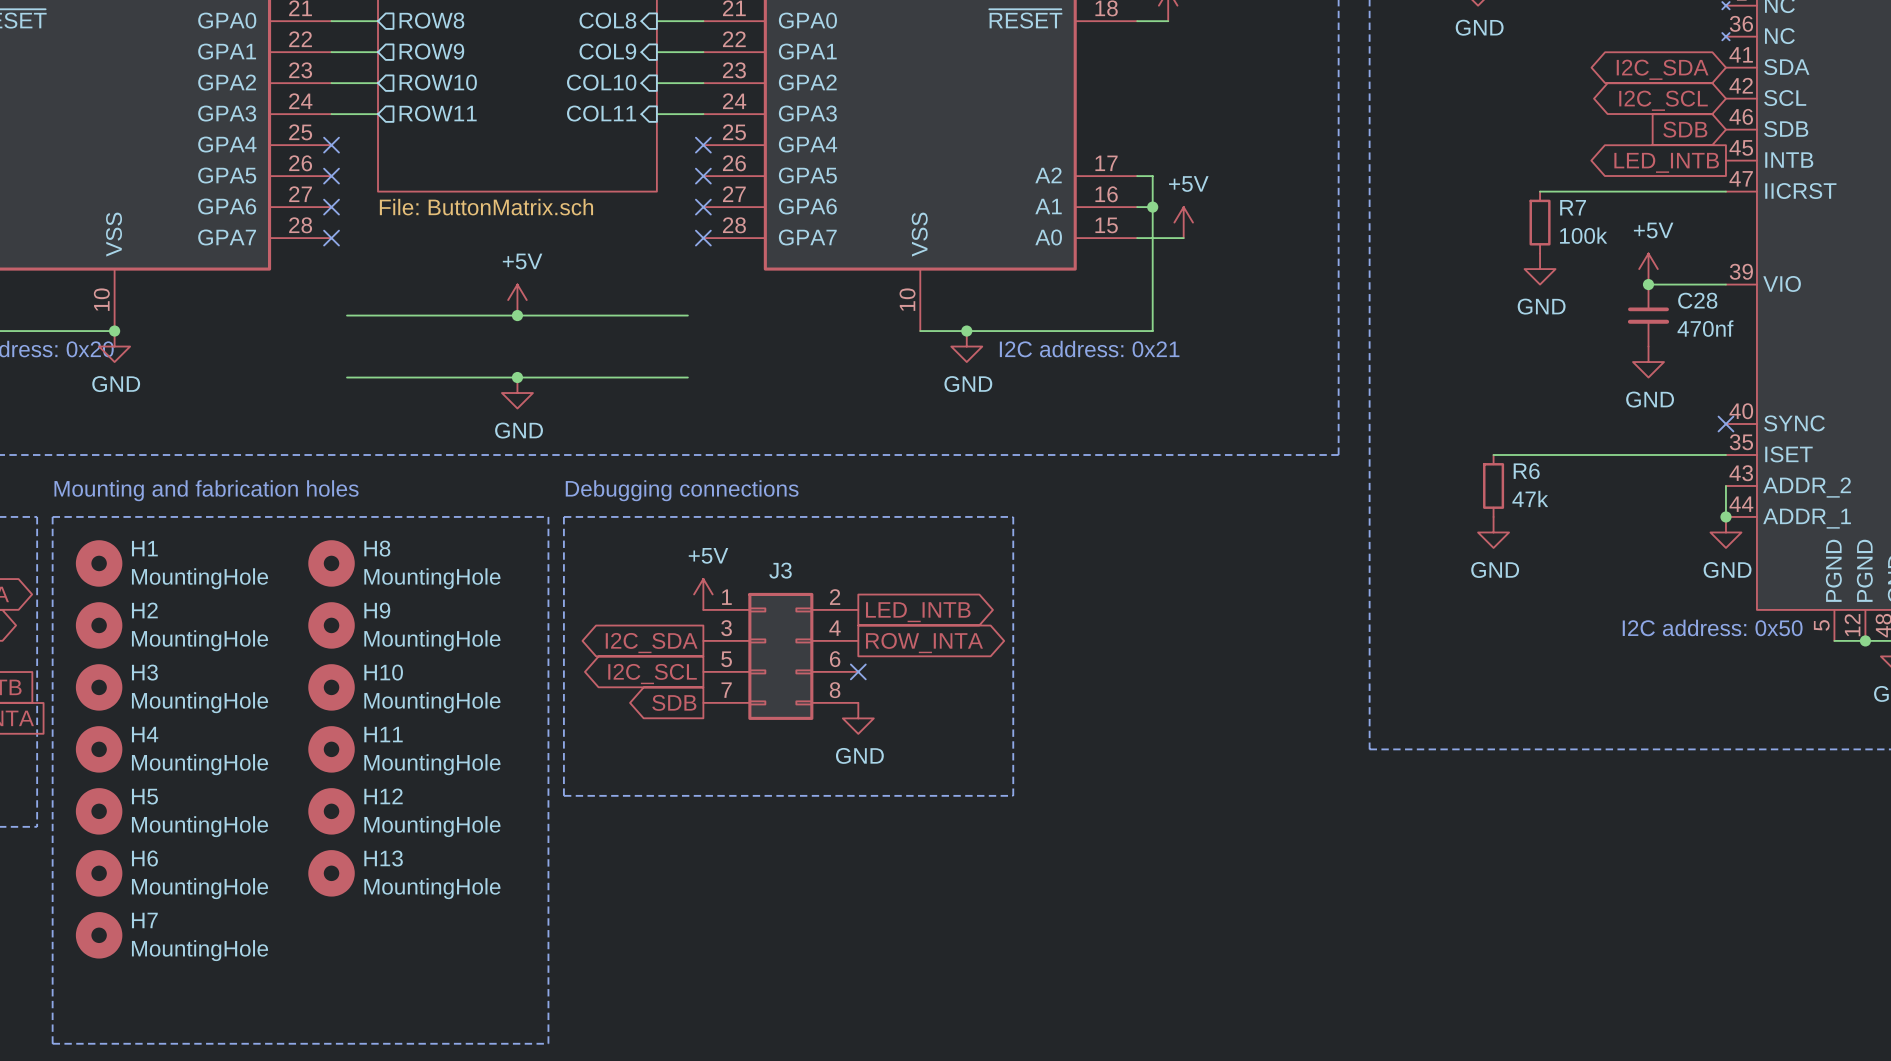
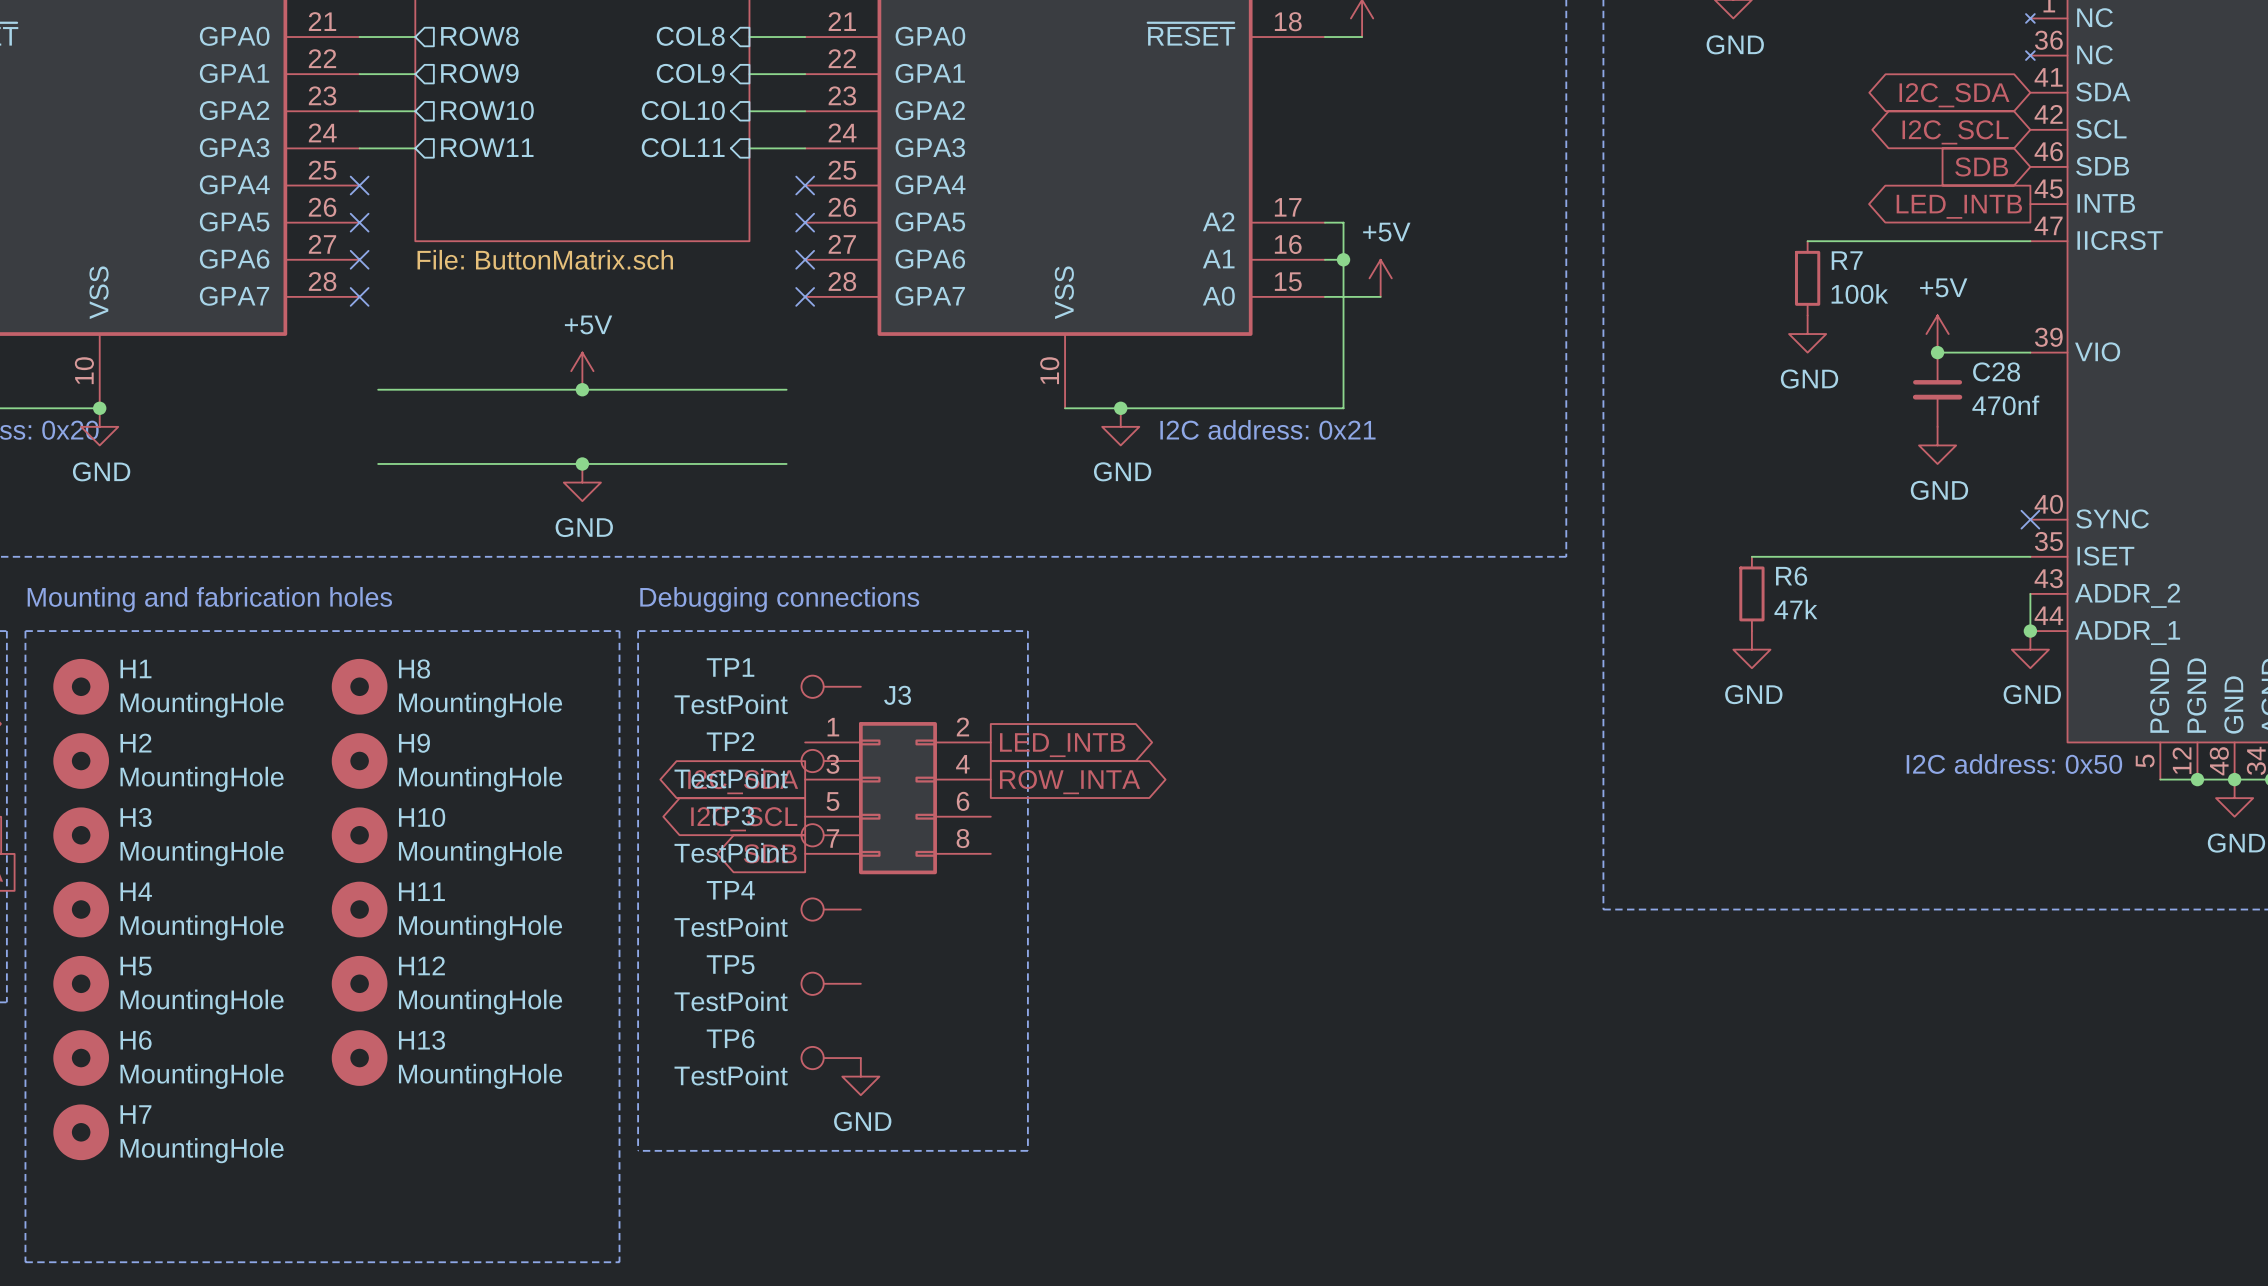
line: (889, 516) (1013, 516) (1013, 795) (563, 795) -> (1027, 631) (1027, 1150) (638, 1150) (638, 965)
TP1: none -> TestPoint (831, 686)
power symbol: +5V (703, 594) -> none
TP2: none -> TestPoint (831, 761)
no-connect mark: (858, 671) -> none
TP3: none -> TestPoint (831, 835)
power symbol position: GND (858, 718) -> GND (860, 1076)
TP4: none -> TestPoint (831, 909)
TP5: none -> TestPoint (831, 983)
TP6: none -> TestPoint (831, 1058)

